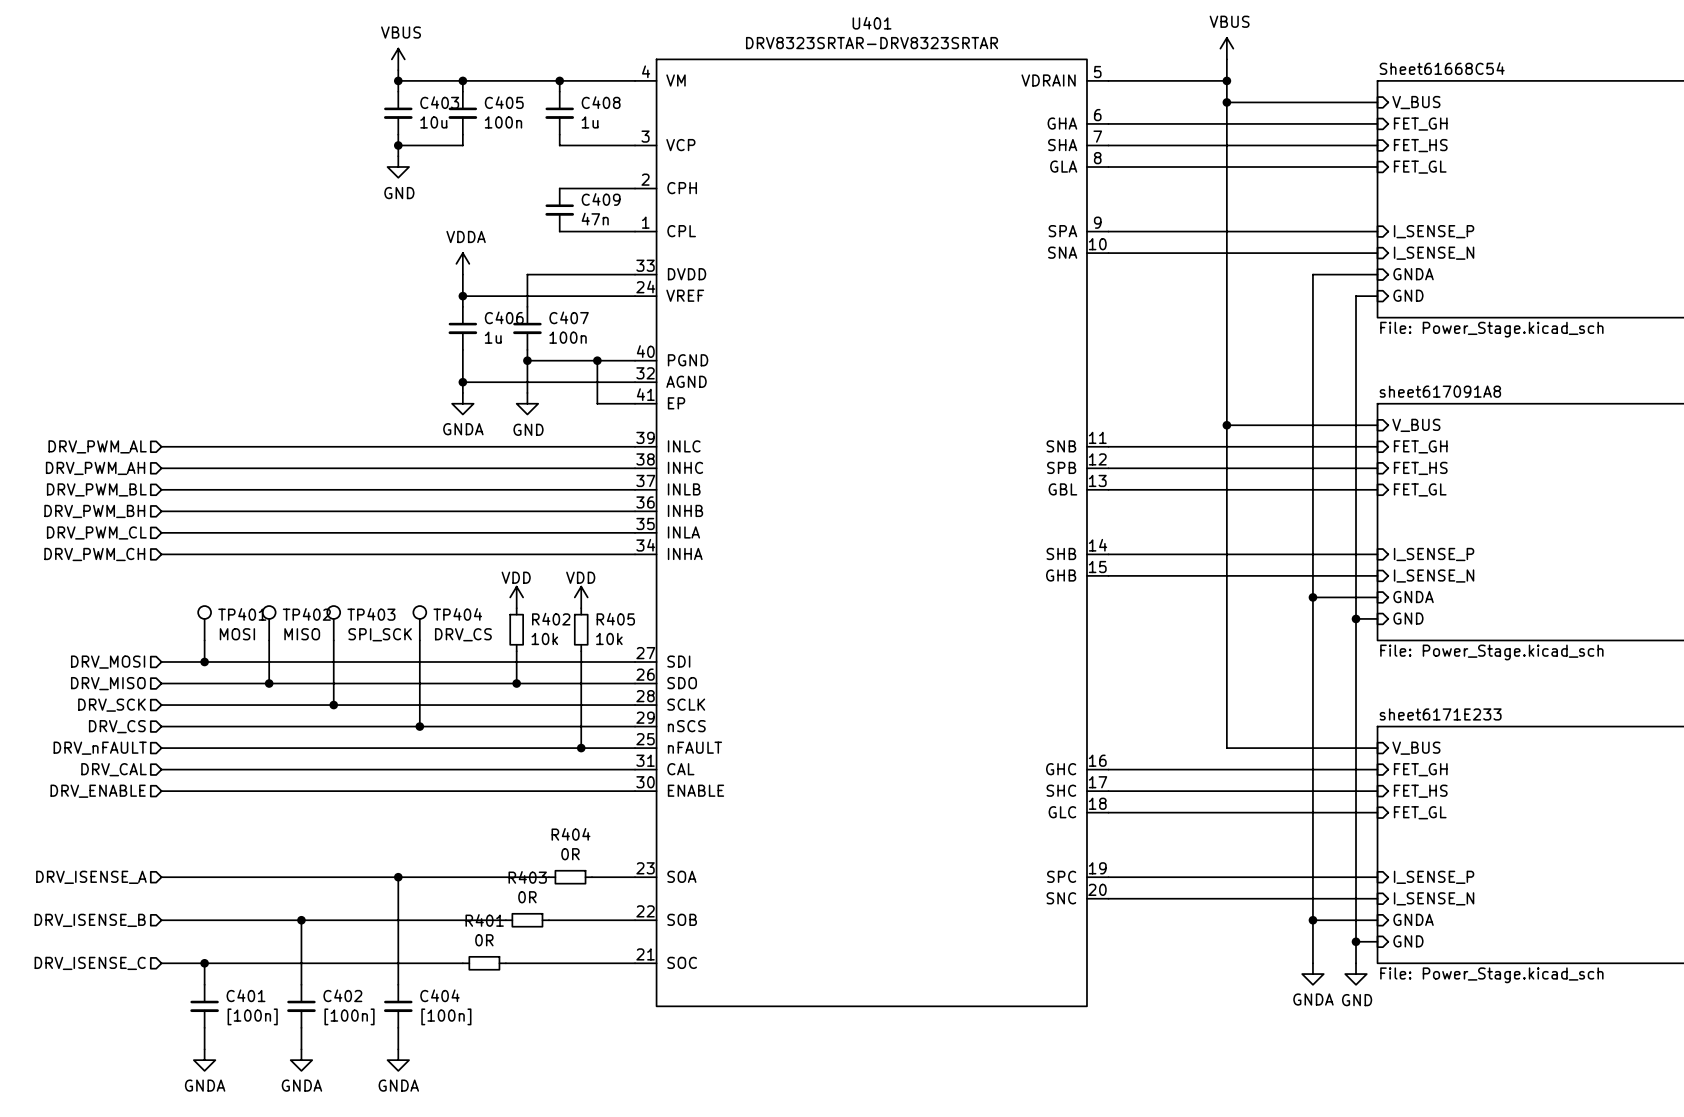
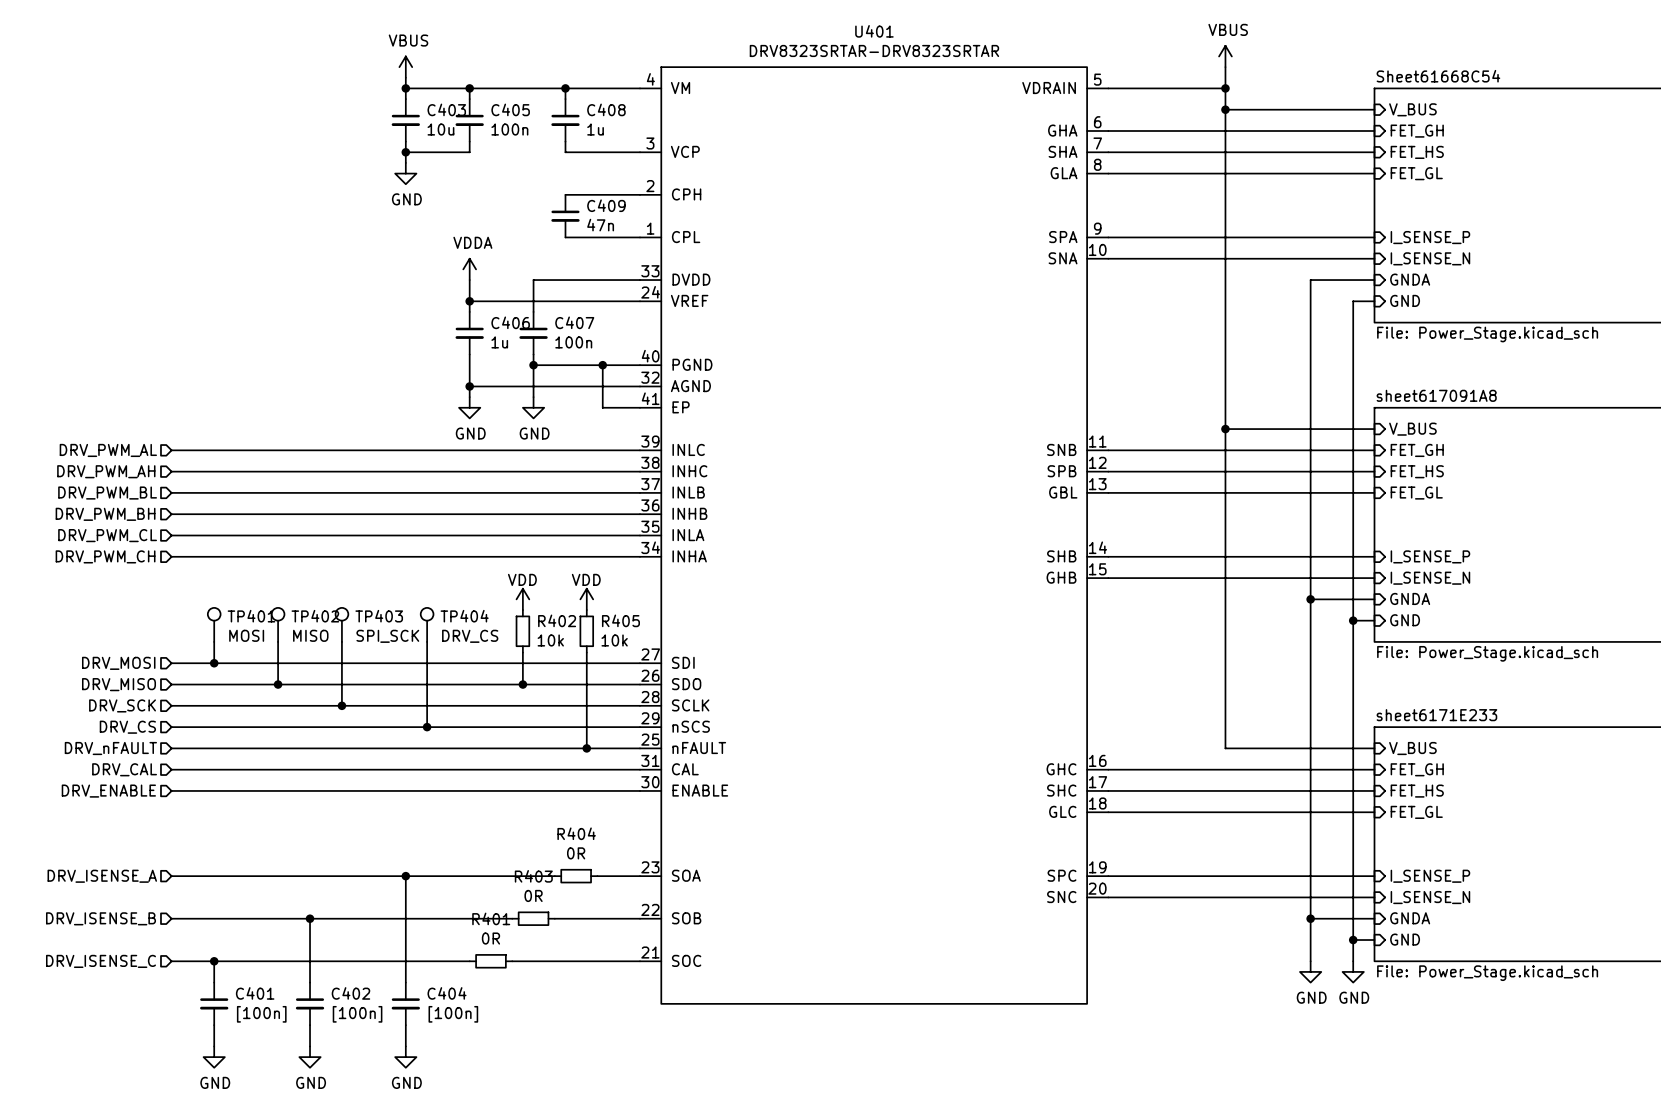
power symbol: GNDA (462, 403) -> GND (469, 407)
power symbol: GNDA (1312, 974) -> GND (1310, 971)
power symbol: GNDA (204, 1060) -> GND (214, 1057)
power symbol: GNDA (301, 1060) -> GND (310, 1057)
power symbol: GNDA (398, 1060) -> GND (405, 1057)

